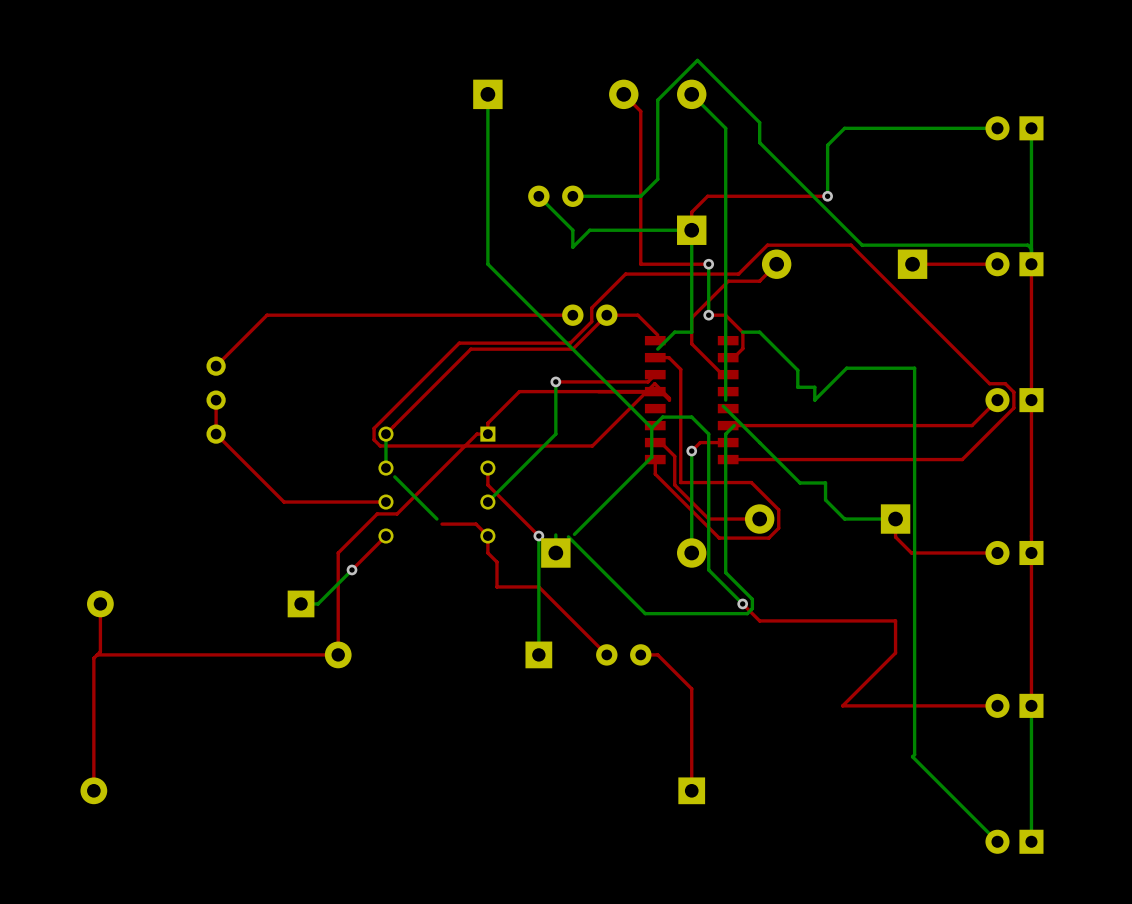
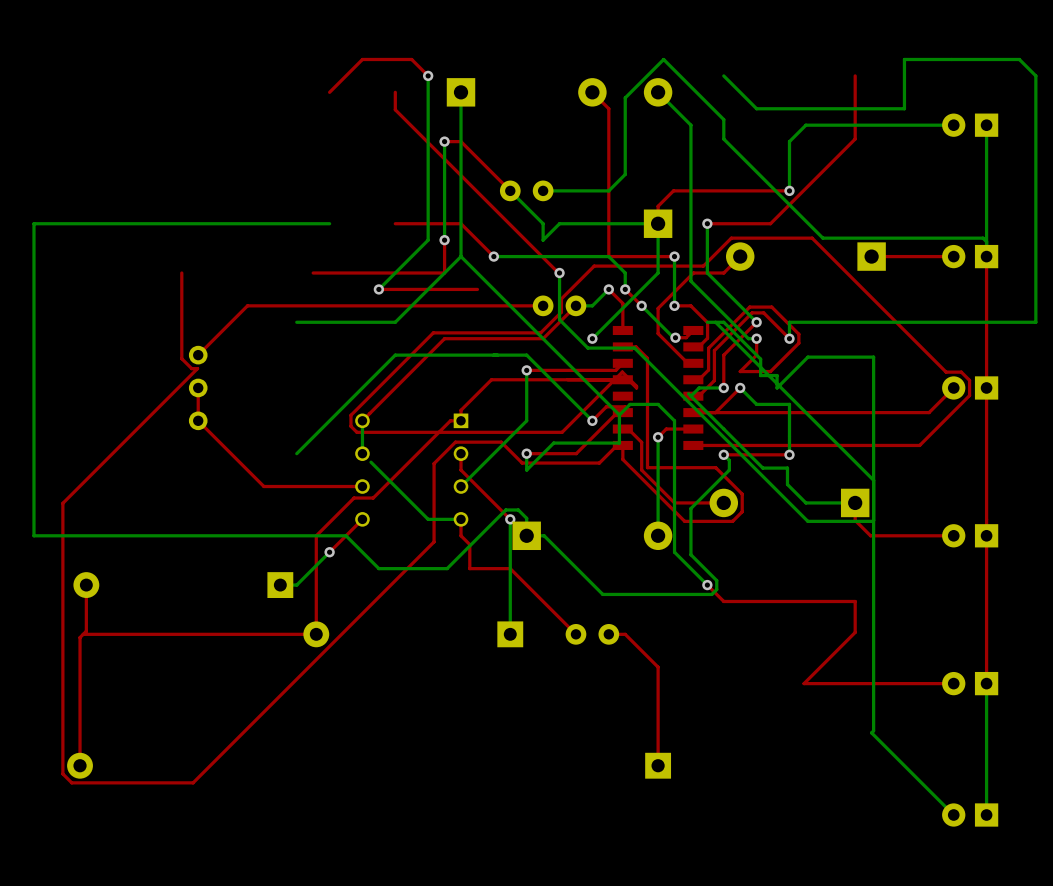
bottom track: none -> (428, 75) (428, 240) (378, 289)
top track: none -> (428, 75) (411, 59) (362, 59) (329, 92)
via: none -> (428, 75)
bottom track: none -> (723, 75) (756, 108) (904, 108) (904, 59) (1019, 59) (1035, 75) (1035, 322) (789, 322) (789, 338)
top track: none -> (855, 75) (855, 139) (770, 223) (707, 223)
top track: none -> (395, 92) (395, 109) (559, 273)
bottom track: none -> (444, 141) (444, 240)
top track: none -> (444, 141) (461, 141) (510, 190)
via: none -> (444, 141)
bottom track: none -> (329, 223) (33, 223) (33, 535) (346, 535) (378, 568) (447, 568) (505, 509) (518, 509) (526, 518)
top track: none -> (395, 223) (461, 223) (493, 256)
bottom track: none -> (707, 223) (707, 273) (756, 322)
via: none -> (707, 223)
top track: none -> (444, 240) (444, 273) (313, 273)
via: none -> (444, 240)
bottom track: none -> (461, 256) (395, 322) (296, 322)
bottom track: none -> (493, 256) (608, 256) (625, 273) (625, 289)
via: none -> (493, 256)
top track: none -> (181, 273) (181, 358) (191, 368) (197, 368) (62, 503) (62, 773) (71, 782) (193, 782) (434, 541) (434, 463) (455, 442) (501, 442) (522, 463) (599, 463) (617, 445)
bottom track: none -> (559, 273) (559, 319) (587, 348) (634, 348) (807, 521) (873, 520)
via: none -> (559, 273)
bottom track: (691, 281) (691, 332) (674, 332) (657, 349) -> (658, 273) (592, 338)
bottom track: (725, 289) (725, 400) -> (690, 281) (748, 338) (756, 338)
via: none -> (378, 289)
top track: none -> (477, 289) (378, 289)
bottom track: none -> (608, 289) (592, 305) (575, 305)
top track: none -> (608, 289) (622, 303) (622, 330)
via: none -> (608, 289)
top track: none -> (625, 289) (641, 305)
via: none -> (625, 289)
top track: (606, 315) (637, 315) (657, 335) -> none
bottom track: none -> (641, 305) (675, 337)
via: none -> (641, 305)
bottom track: none -> (715, 322) (873, 480)
top track: none -> (756, 322) (723, 355) (723, 387)
via: none -> (756, 322)
top track: none -> (693, 330) (686, 337) (675, 337)
via: none -> (675, 337)
via: none -> (592, 338)
top track: none -> (756, 338) (756, 355) (740, 371) (770, 371) (798, 343) (798, 334) (771, 307) (749, 307) (708, 348) (708, 370) (698, 379) (693, 379)
via: none -> (756, 338)
top track: none -> (789, 338) (763, 312) (752, 312) (714, 350) (714, 380) (698, 396) (693, 396)
via: none -> (789, 338)
bottom track: none -> (723, 387) (699, 387) (690, 396)
via: none -> (723, 387)
bottom track: none -> (740, 387) (756, 404) (789, 404) (789, 454)
top track: none -> (740, 387) (715, 412)
via: none -> (740, 387)
top track: none -> (622, 412) (617, 412) (576, 453) (526, 453)
bottom track: (734, 425) (725, 434) (725, 524) -> (723, 454) (729, 460) (729, 470) (690, 508)
top track: none -> (628, 415) (628, 410) (625, 406) (606, 406) (592, 420)
bottom track: none -> (592, 420) (526, 355) (395, 355) (296, 453)
via: none -> (592, 420)
bottom track: (651, 457) (574, 534) -> (619, 443) (553, 443) (526, 470) (526, 453)
via: none -> (526, 453)
via: none -> (723, 454)
top track: none -> (789, 454) (723, 454)
via: none -> (789, 454)
bottom track: none -> (411, 502) (428, 519) (461, 519)
top track: (442, 524) (475, 524) (487, 536) -> none
bottom track: (568, 536) (645, 613) -> (526, 535) (544, 535) (602, 594) (613, 594)

